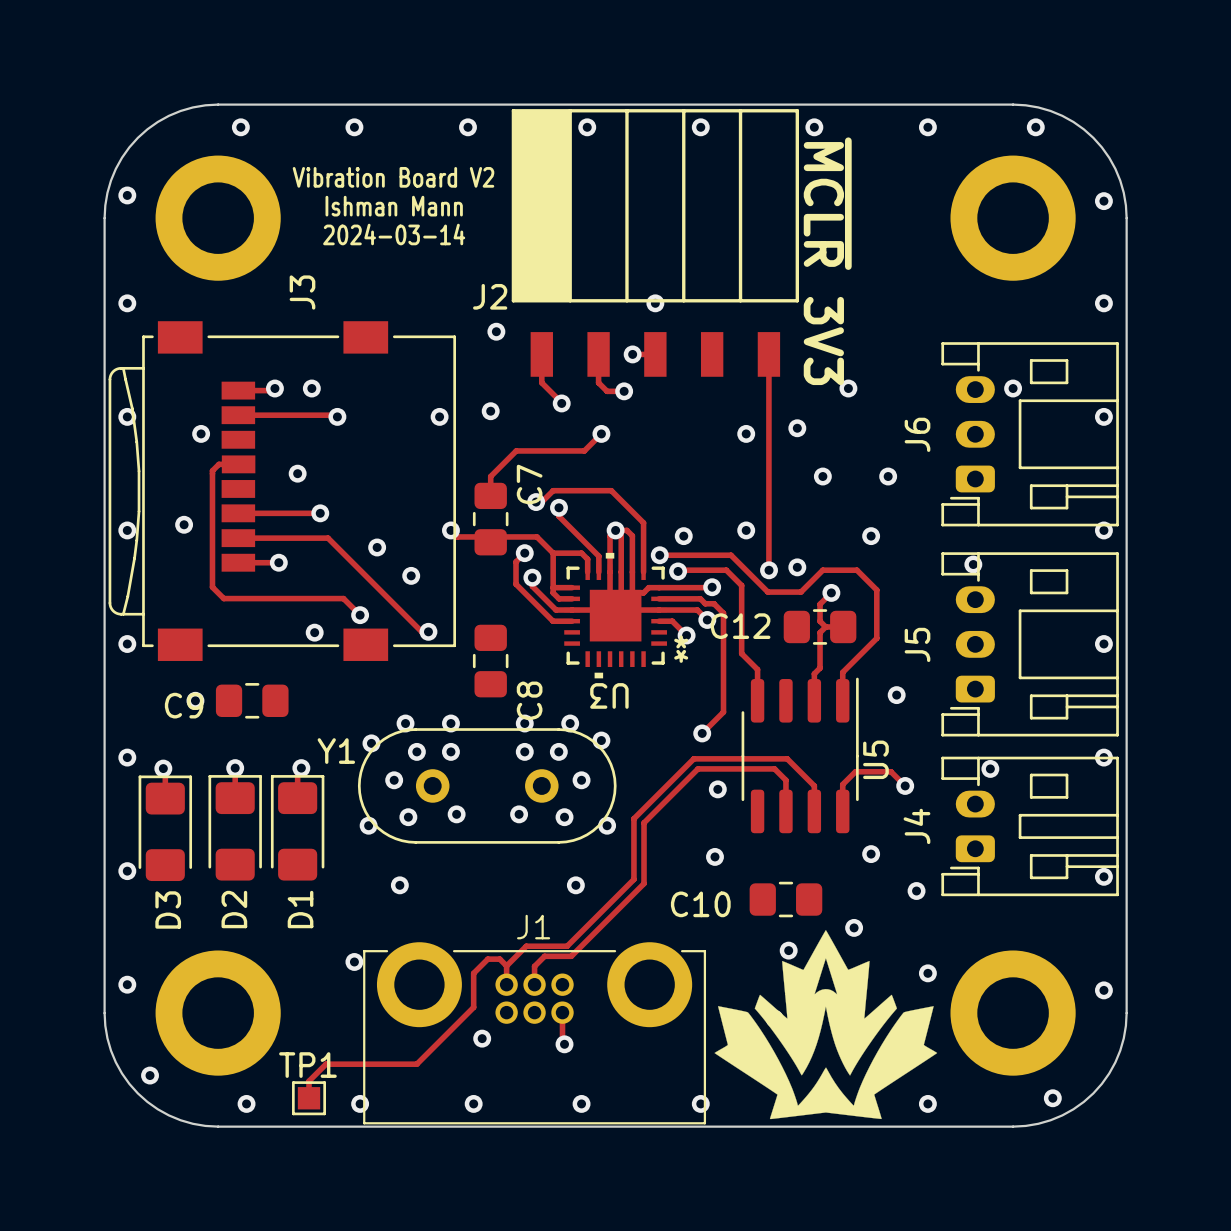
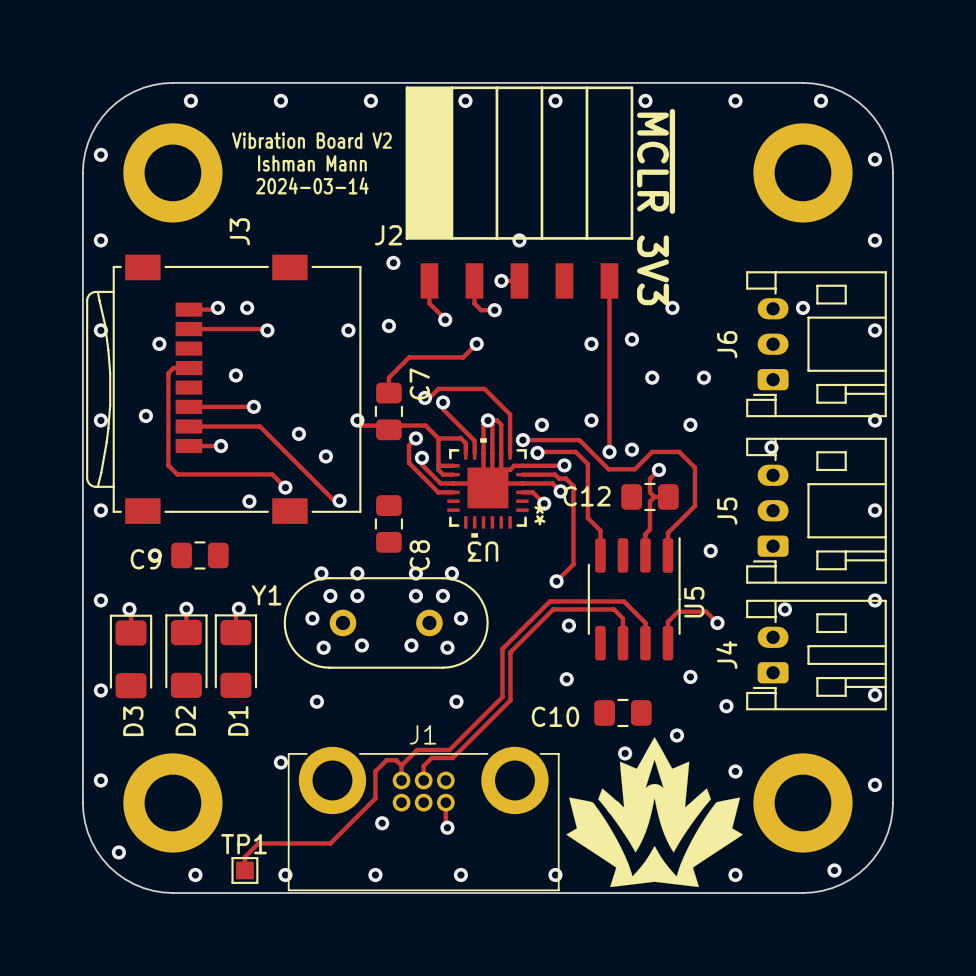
via: (601, 740) -> none
via: (371, 743) -> none
via: (368, 825) -> none
via: (607, 825) -> none

